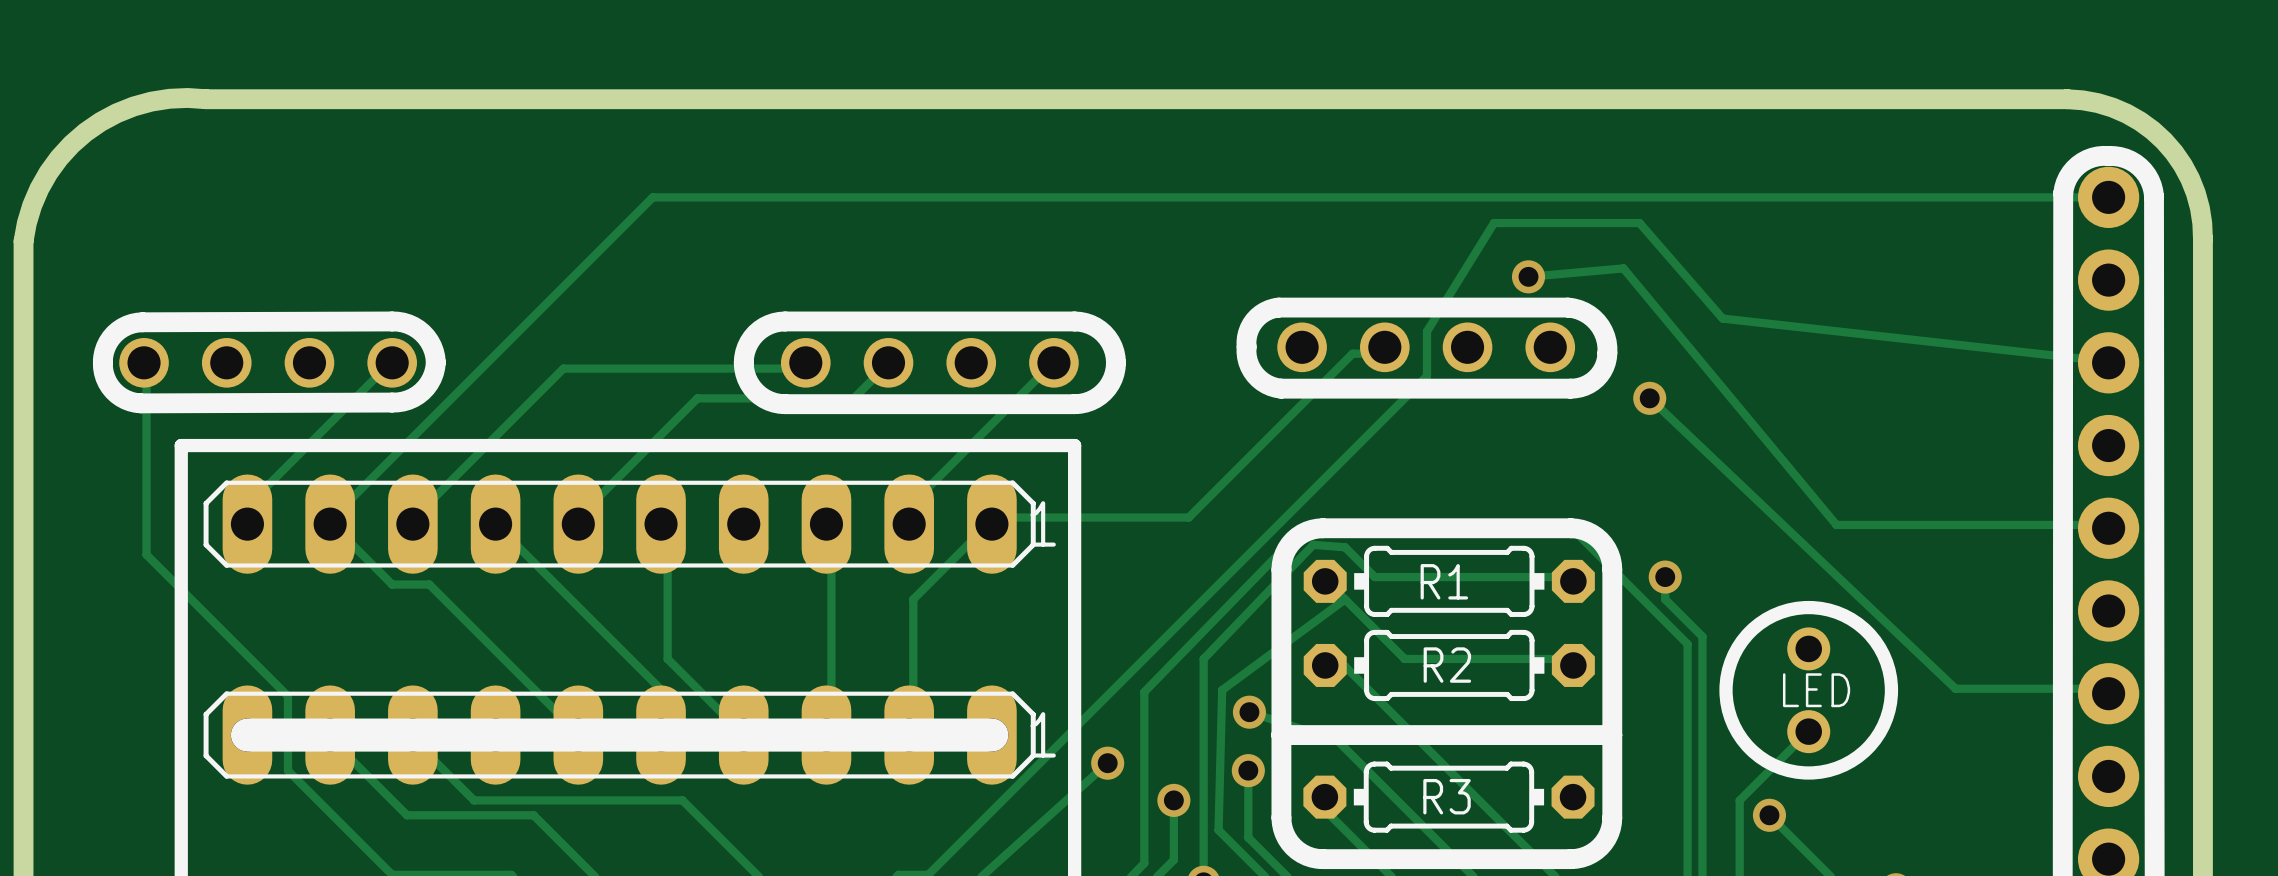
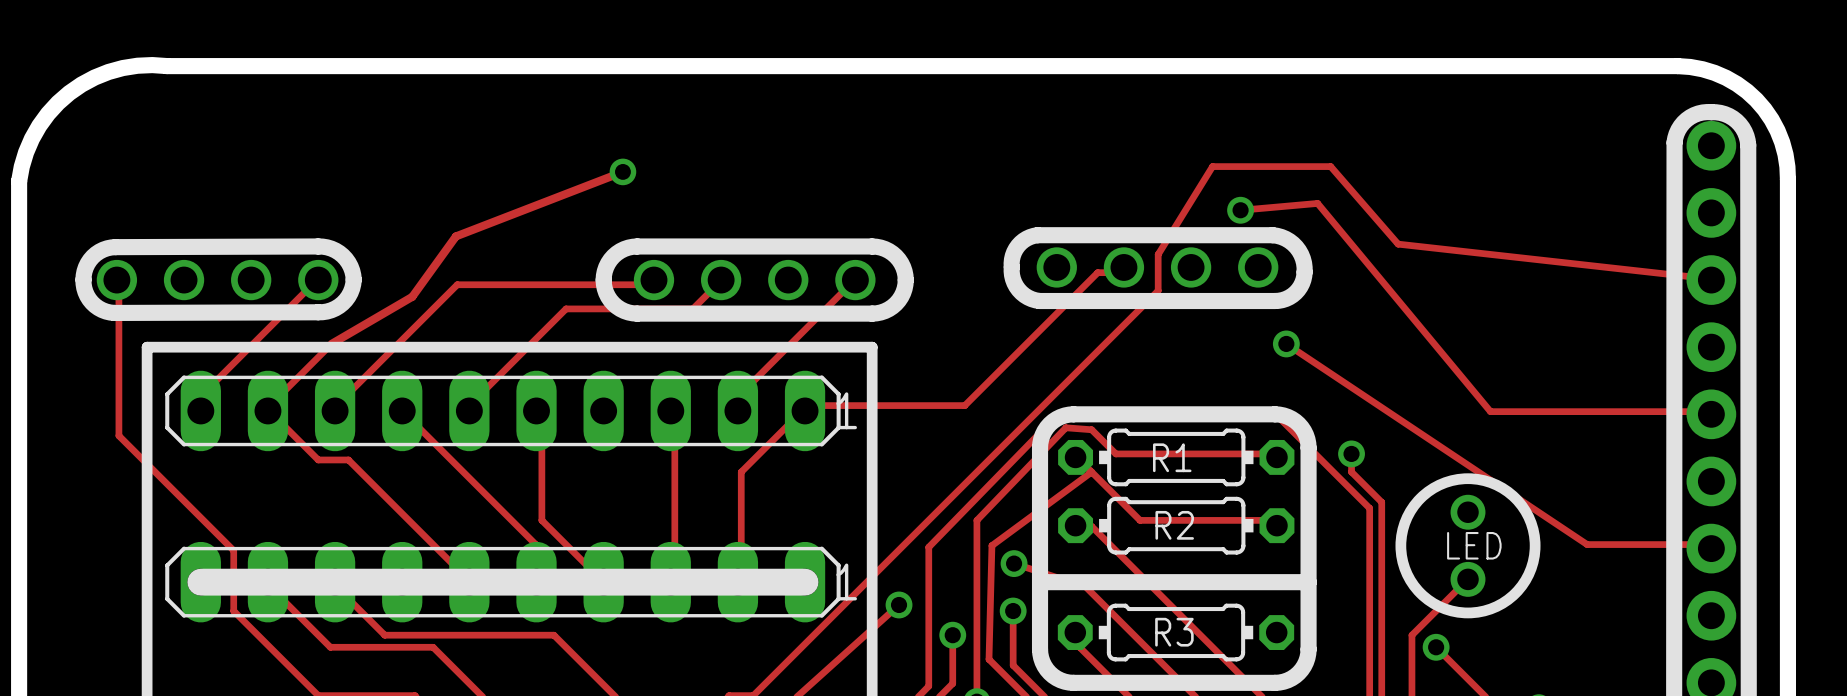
track: (2108, 197) (652, 197) (408, 441) -> (622, 171) (455, 236) (412, 296) (331, 343)
via: none -> (622, 171)
track: (1649, 398) (1955, 688) -> (1286, 343) (1587, 544)
via position: (1649, 398) -> (1286, 343)

